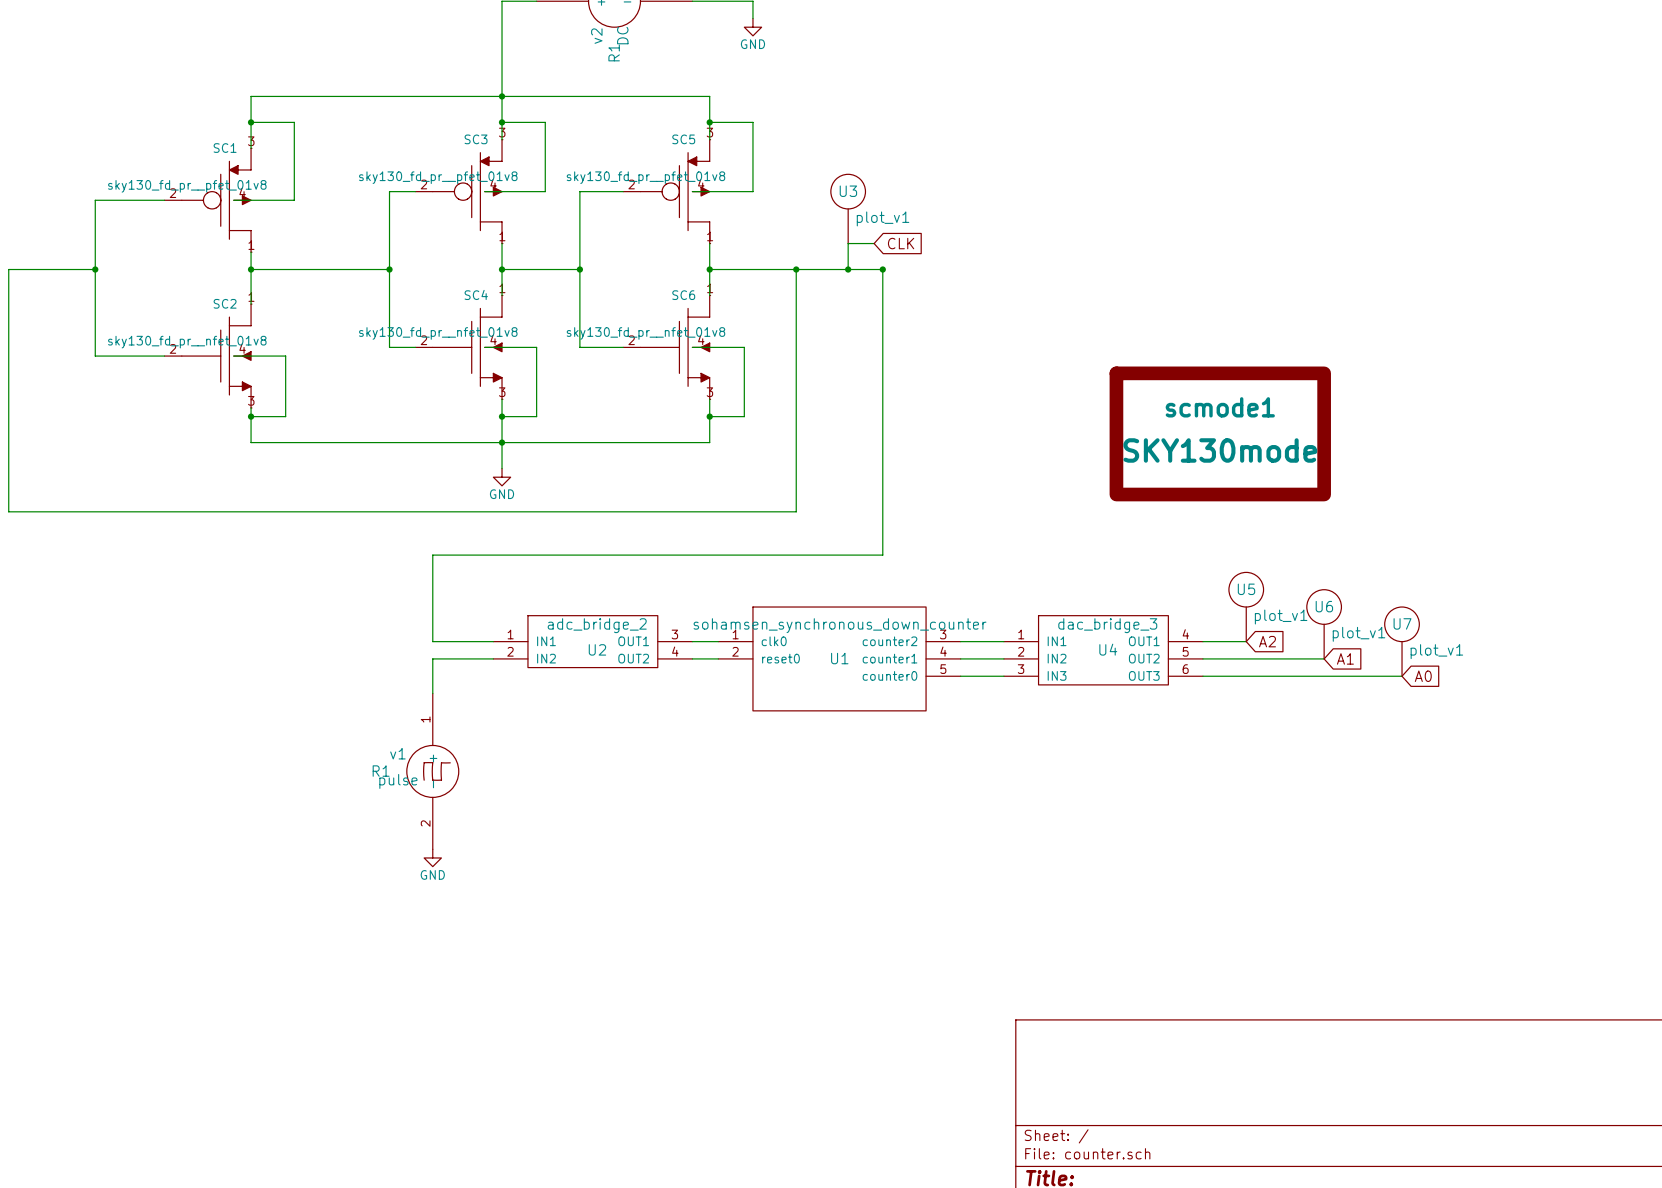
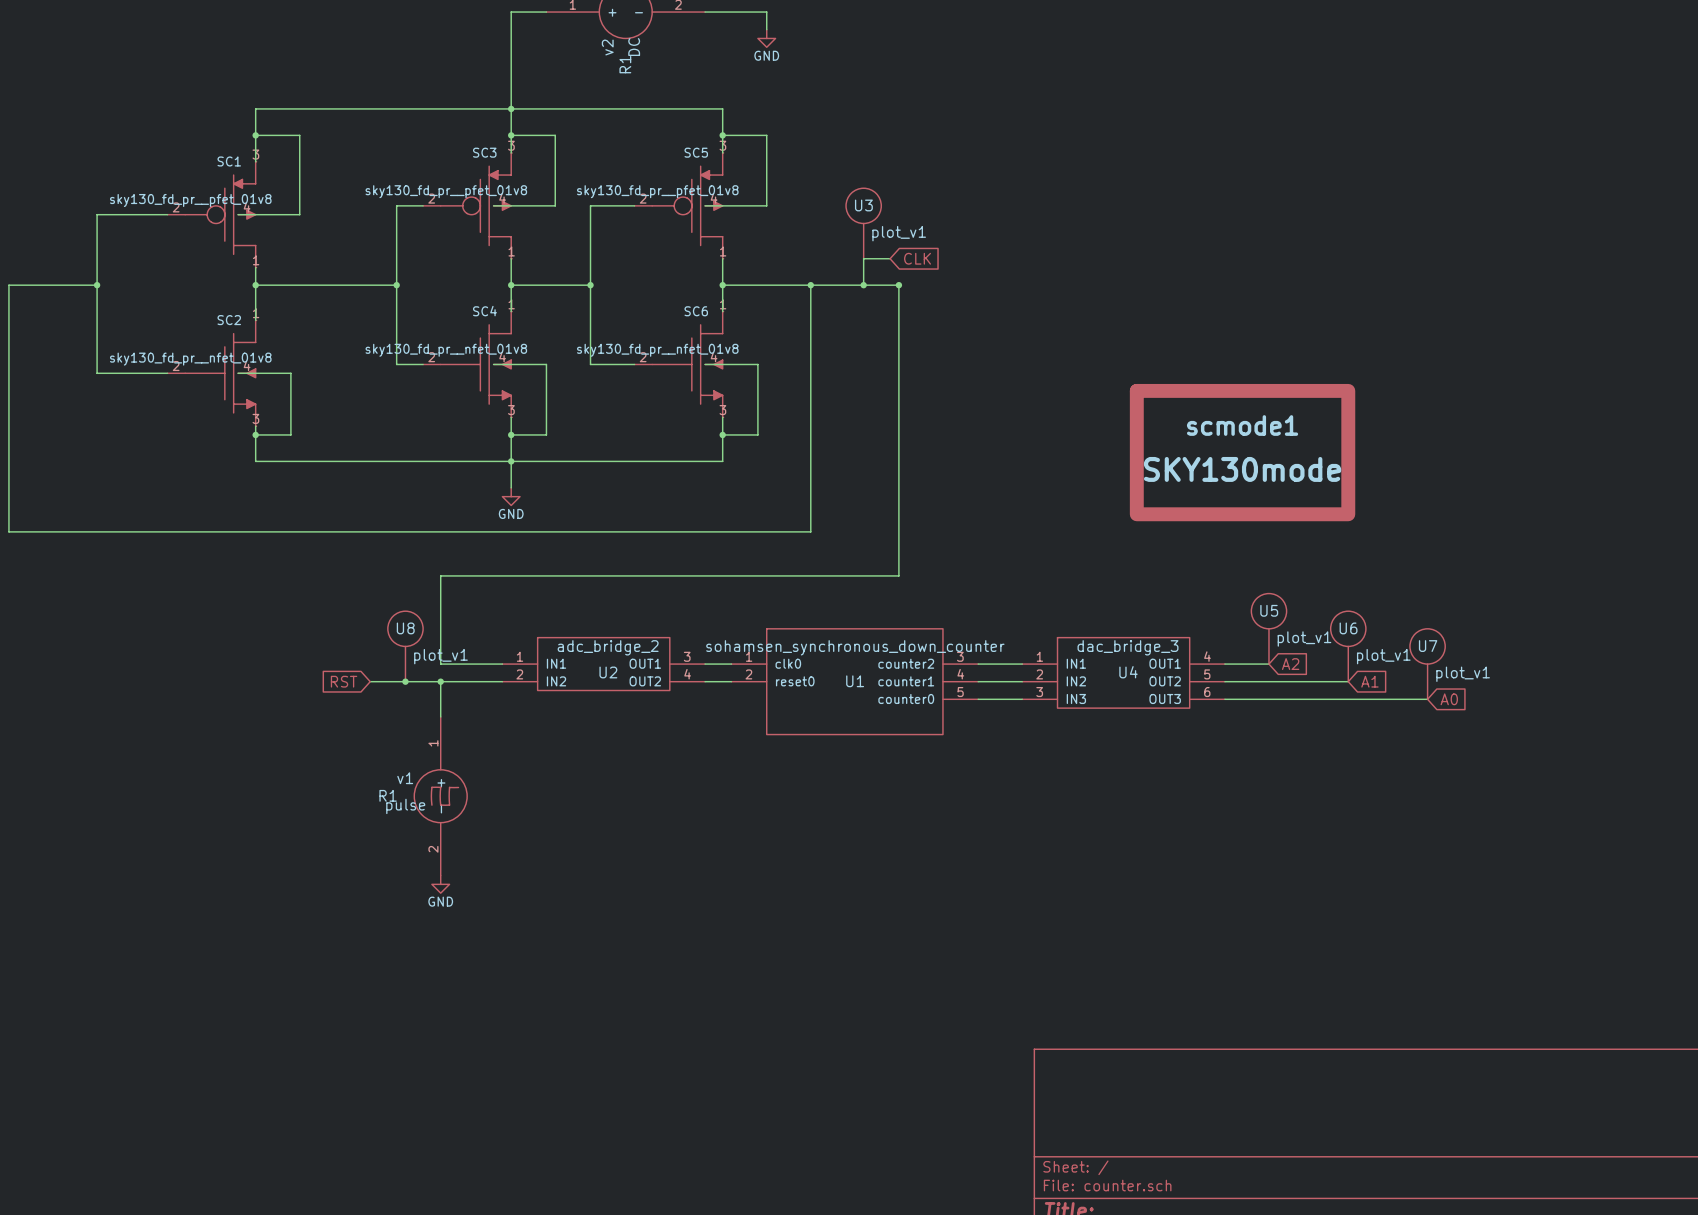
U8: none -> plot_v1 (405, 646)
global label: none -> RST (344, 681)
wire: none -> (370, 681) (440, 681)
junction: none -> (405, 681)
junction: none -> (440, 681)

